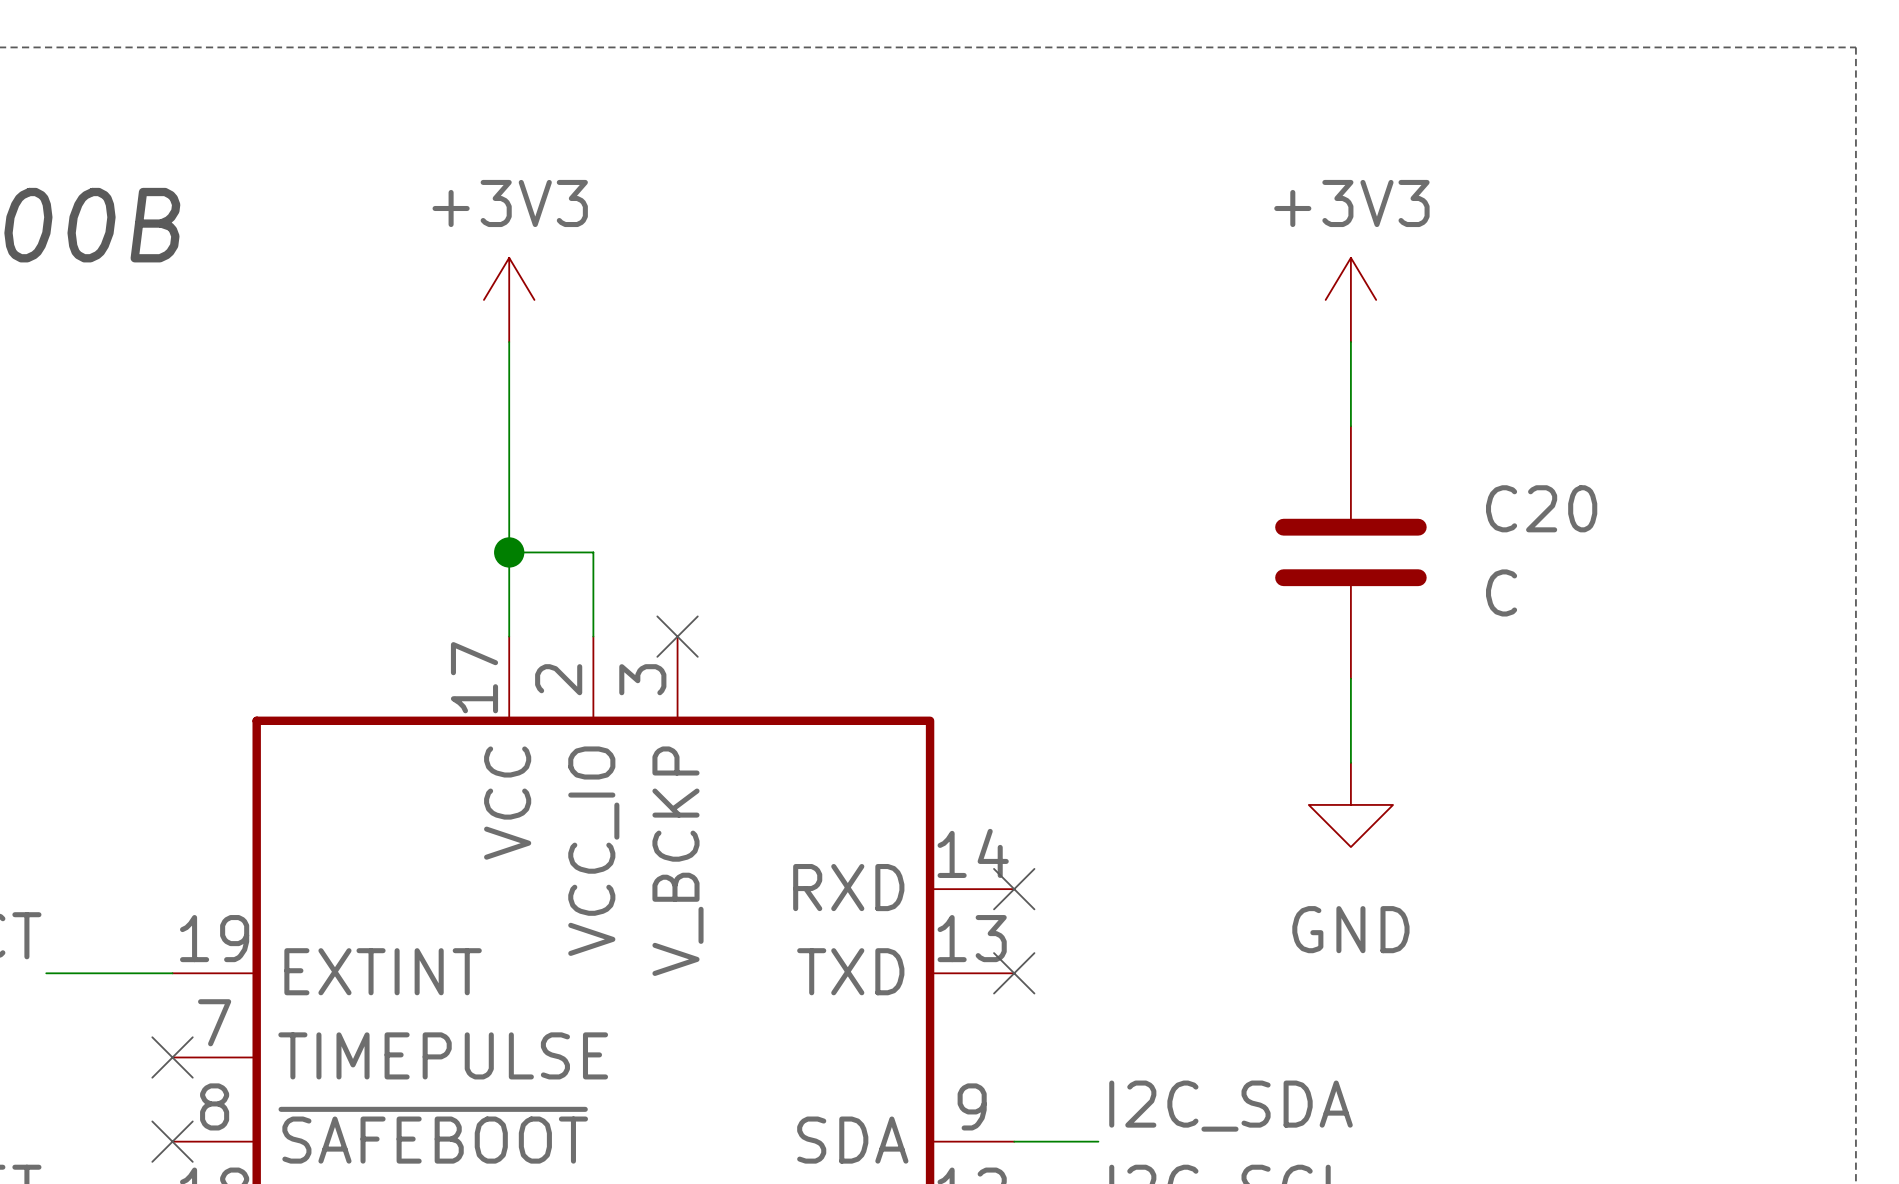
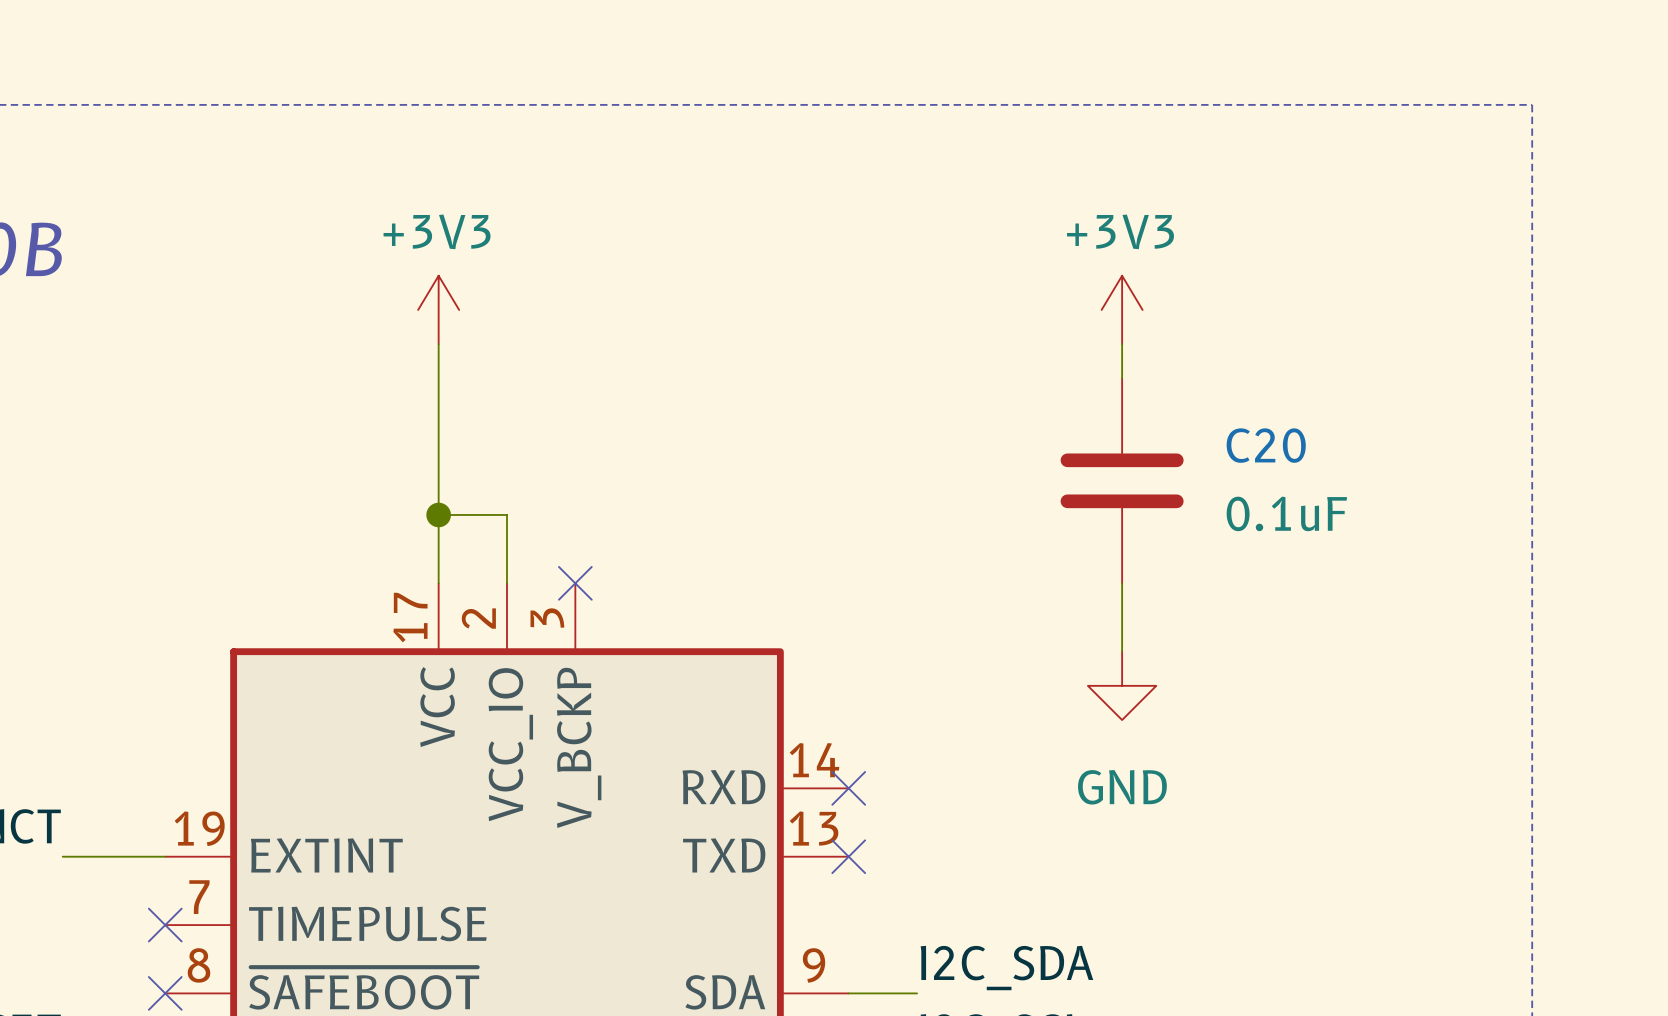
C20 position: (1350, 552) -> (1122, 480)
C20 value: C (1501, 592) -> 0.1uF (1286, 513)
power symbol position: GND (1350, 804) -> GND (1122, 685)

